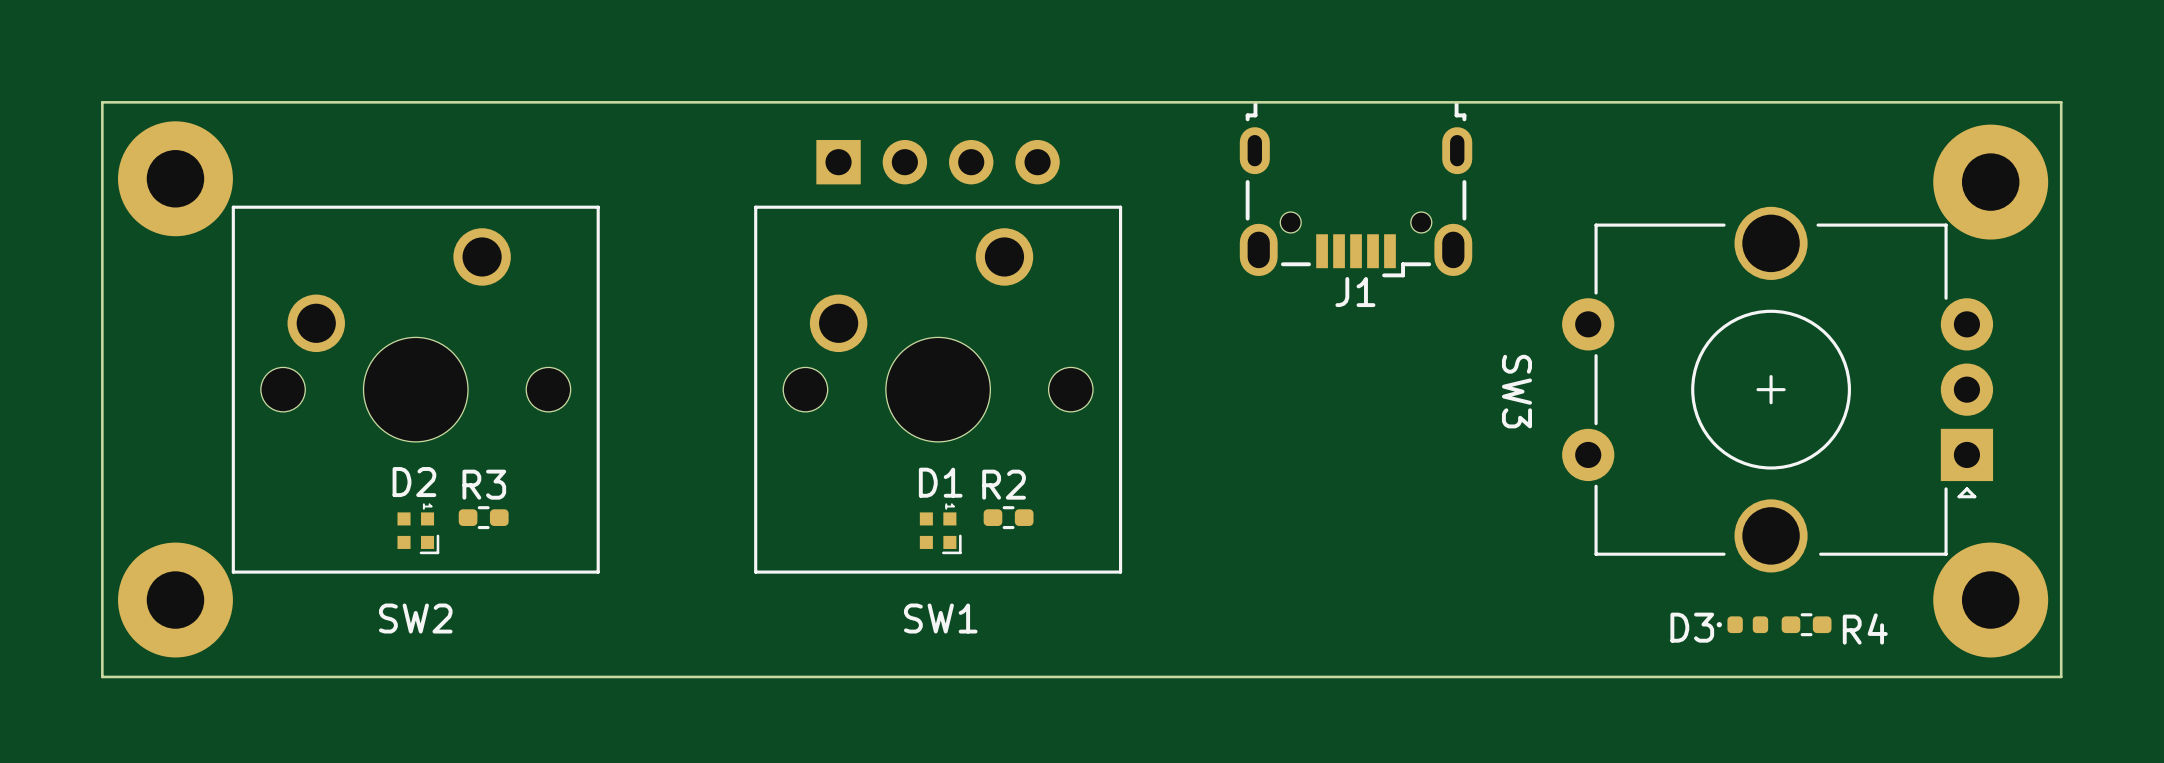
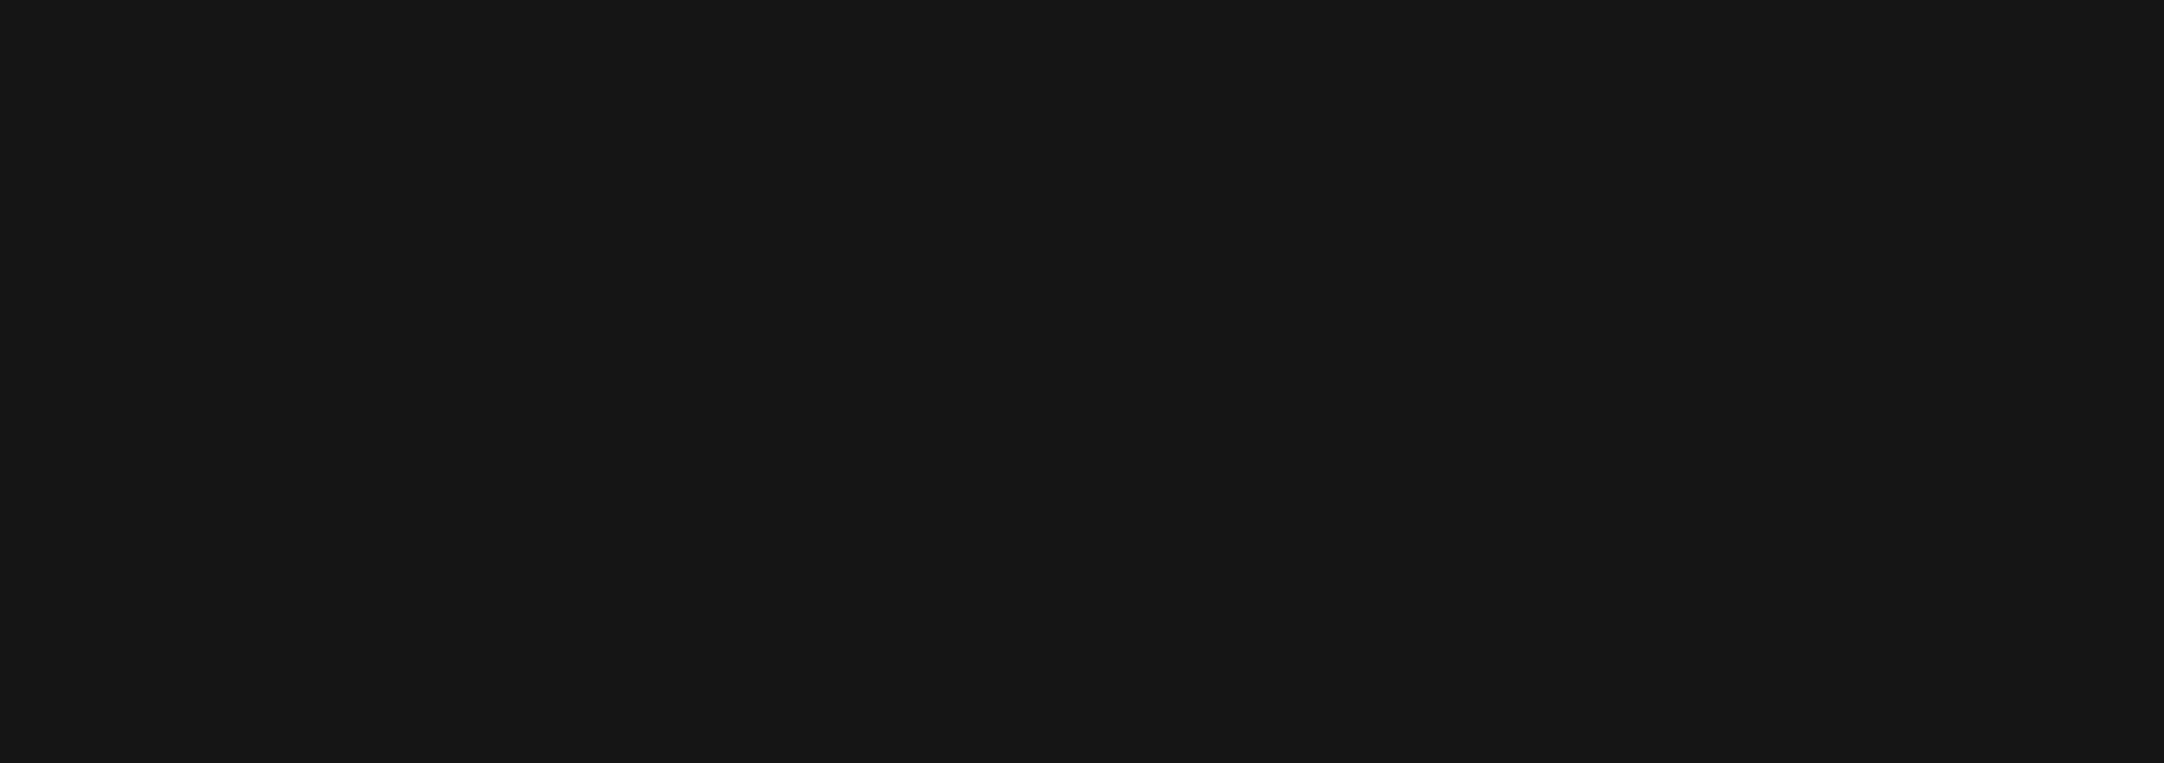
board edge: (2061, 102) (102, 102) (102, 676) (2061, 676) (2061, 102) -> none
part: (938, 162) -> none
part: (175, 178) -> none
part: (1990, 182) -> none
J1: (1356, 189) -> none
SW2: (415, 389) -> none
SW1: (938, 389) -> none
SW3: (1777, 389) -> none
R3: (483, 517) -> none
R2: (1008, 517) -> none
D2: (418, 533) -> none
D1: (940, 533) -> none
part: (175, 600) -> none
part: (1990, 600) -> none
D3: (1742, 624) -> none
R4: (1806, 624) -> none

